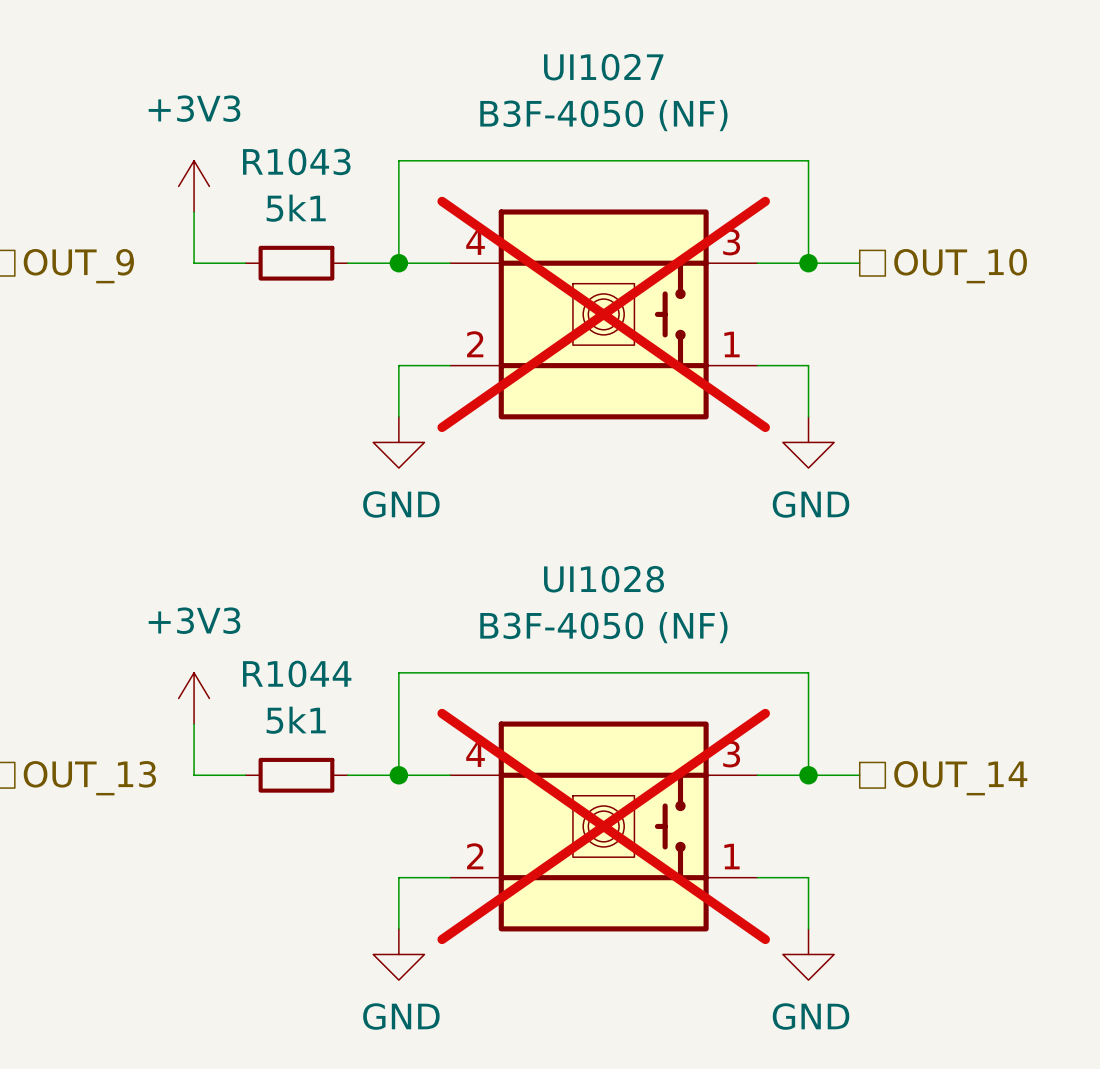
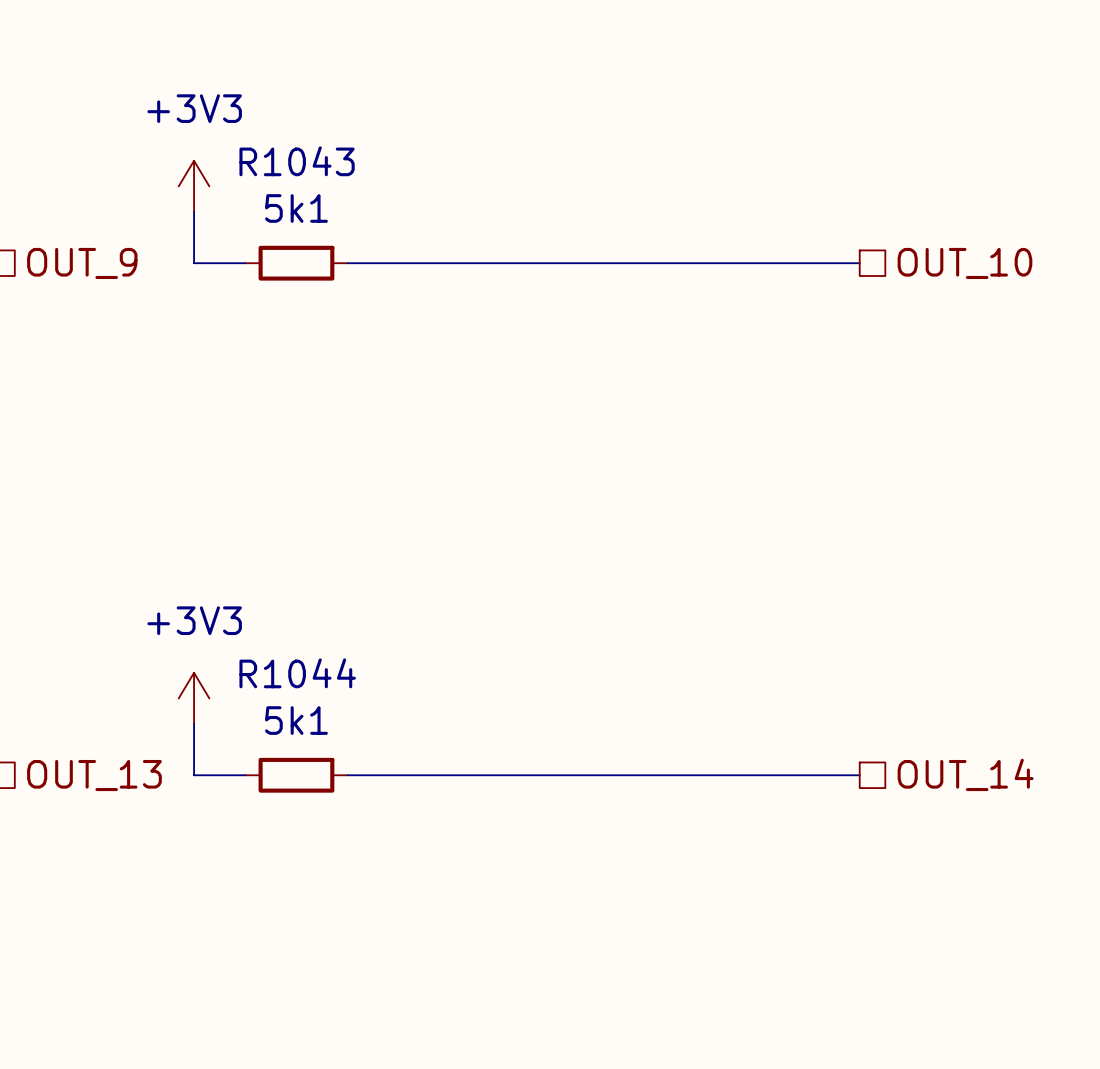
wire: (398, 263) (398, 160) (808, 160) (808, 263) -> none
junction: (398, 263) -> none
junction: (808, 263) -> none
UI1027: B3F-4050 (NF) (603, 314) -> none
wire: (450, 365) (398, 365) (398, 416) -> none
wire: (757, 365) (808, 365) (808, 416) -> none
power symbol: GND (398, 442) -> none
power symbol: GND (808, 442) -> none
wire: (398, 775) (398, 672) (808, 672) (808, 775) -> none
junction: (398, 775) -> none
junction: (808, 775) -> none
UI1028: B3F-4050 (NF) (603, 826) -> none
wire: (450, 877) (398, 877) (398, 928) -> none
wire: (757, 877) (808, 877) (808, 928) -> none
power symbol: GND (398, 954) -> none
power symbol: GND (808, 954) -> none

